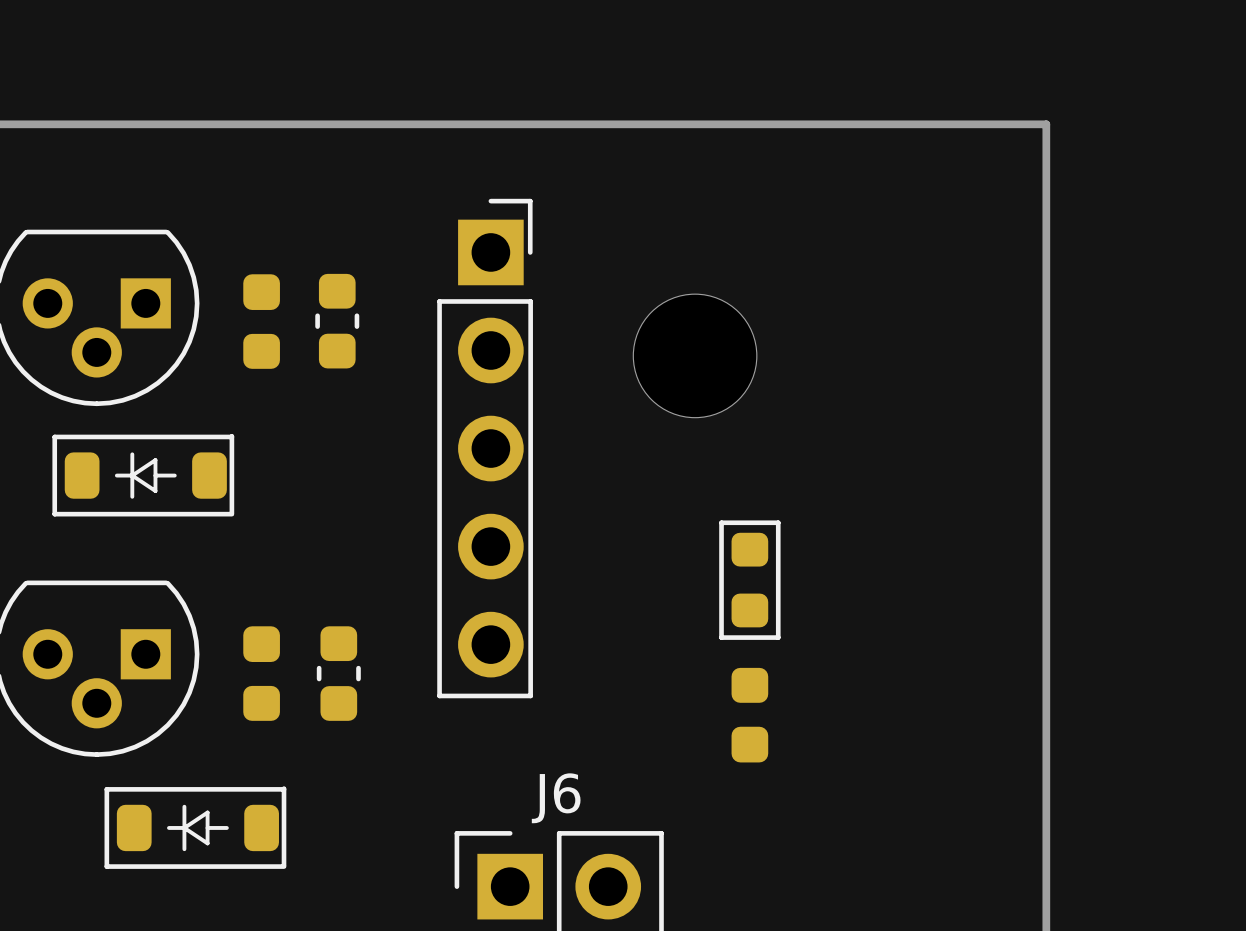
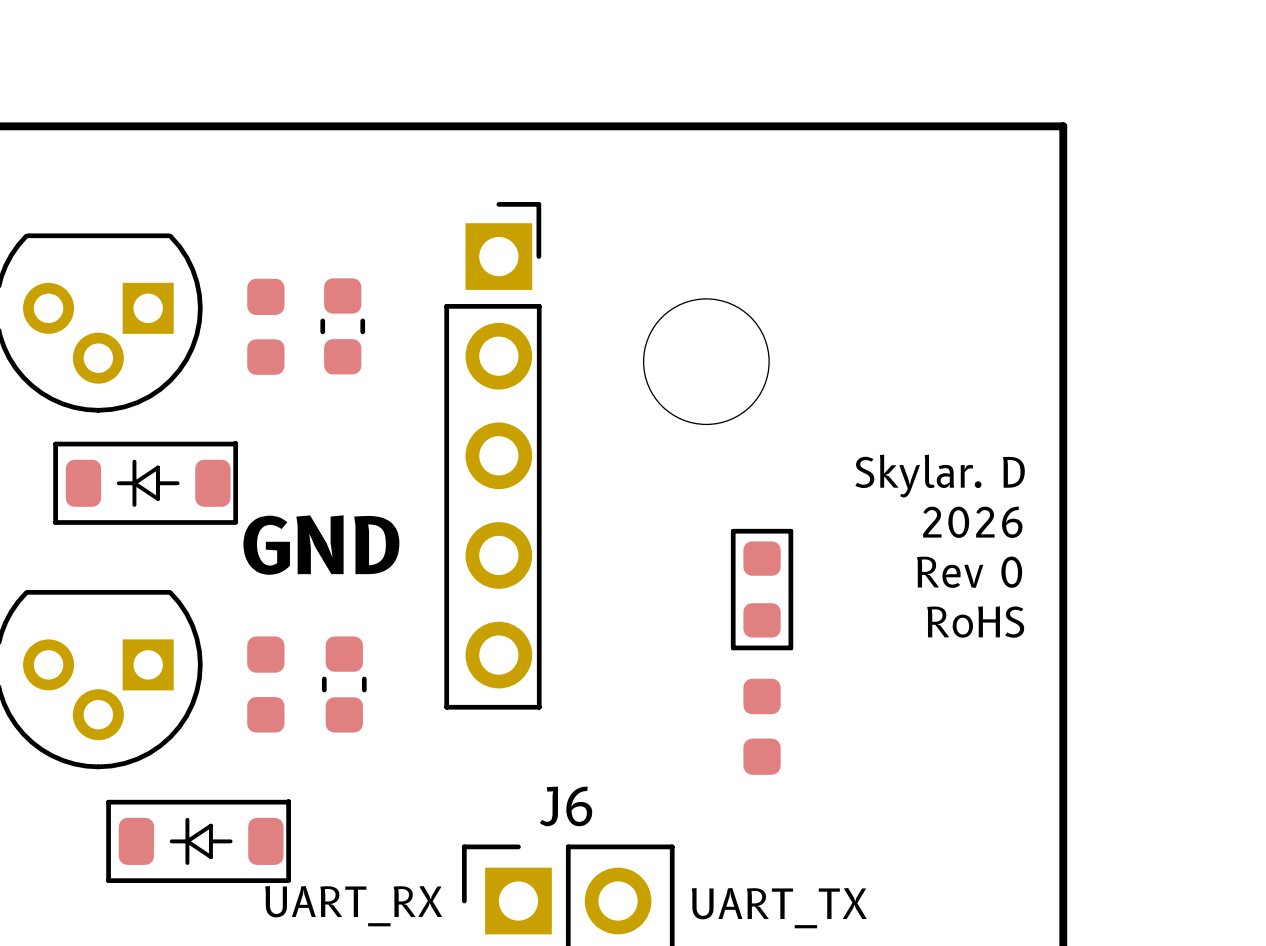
text: none -> Skylar. D (940, 476)
text: none -> 2026 (972, 522)
text: none -> GND (321, 545)
text: none -> Rev 0 (969, 572)
text: none -> RoHS (975, 622)
text: none -> UART_RX (353, 906)
text: none -> UART_TX (779, 908)

